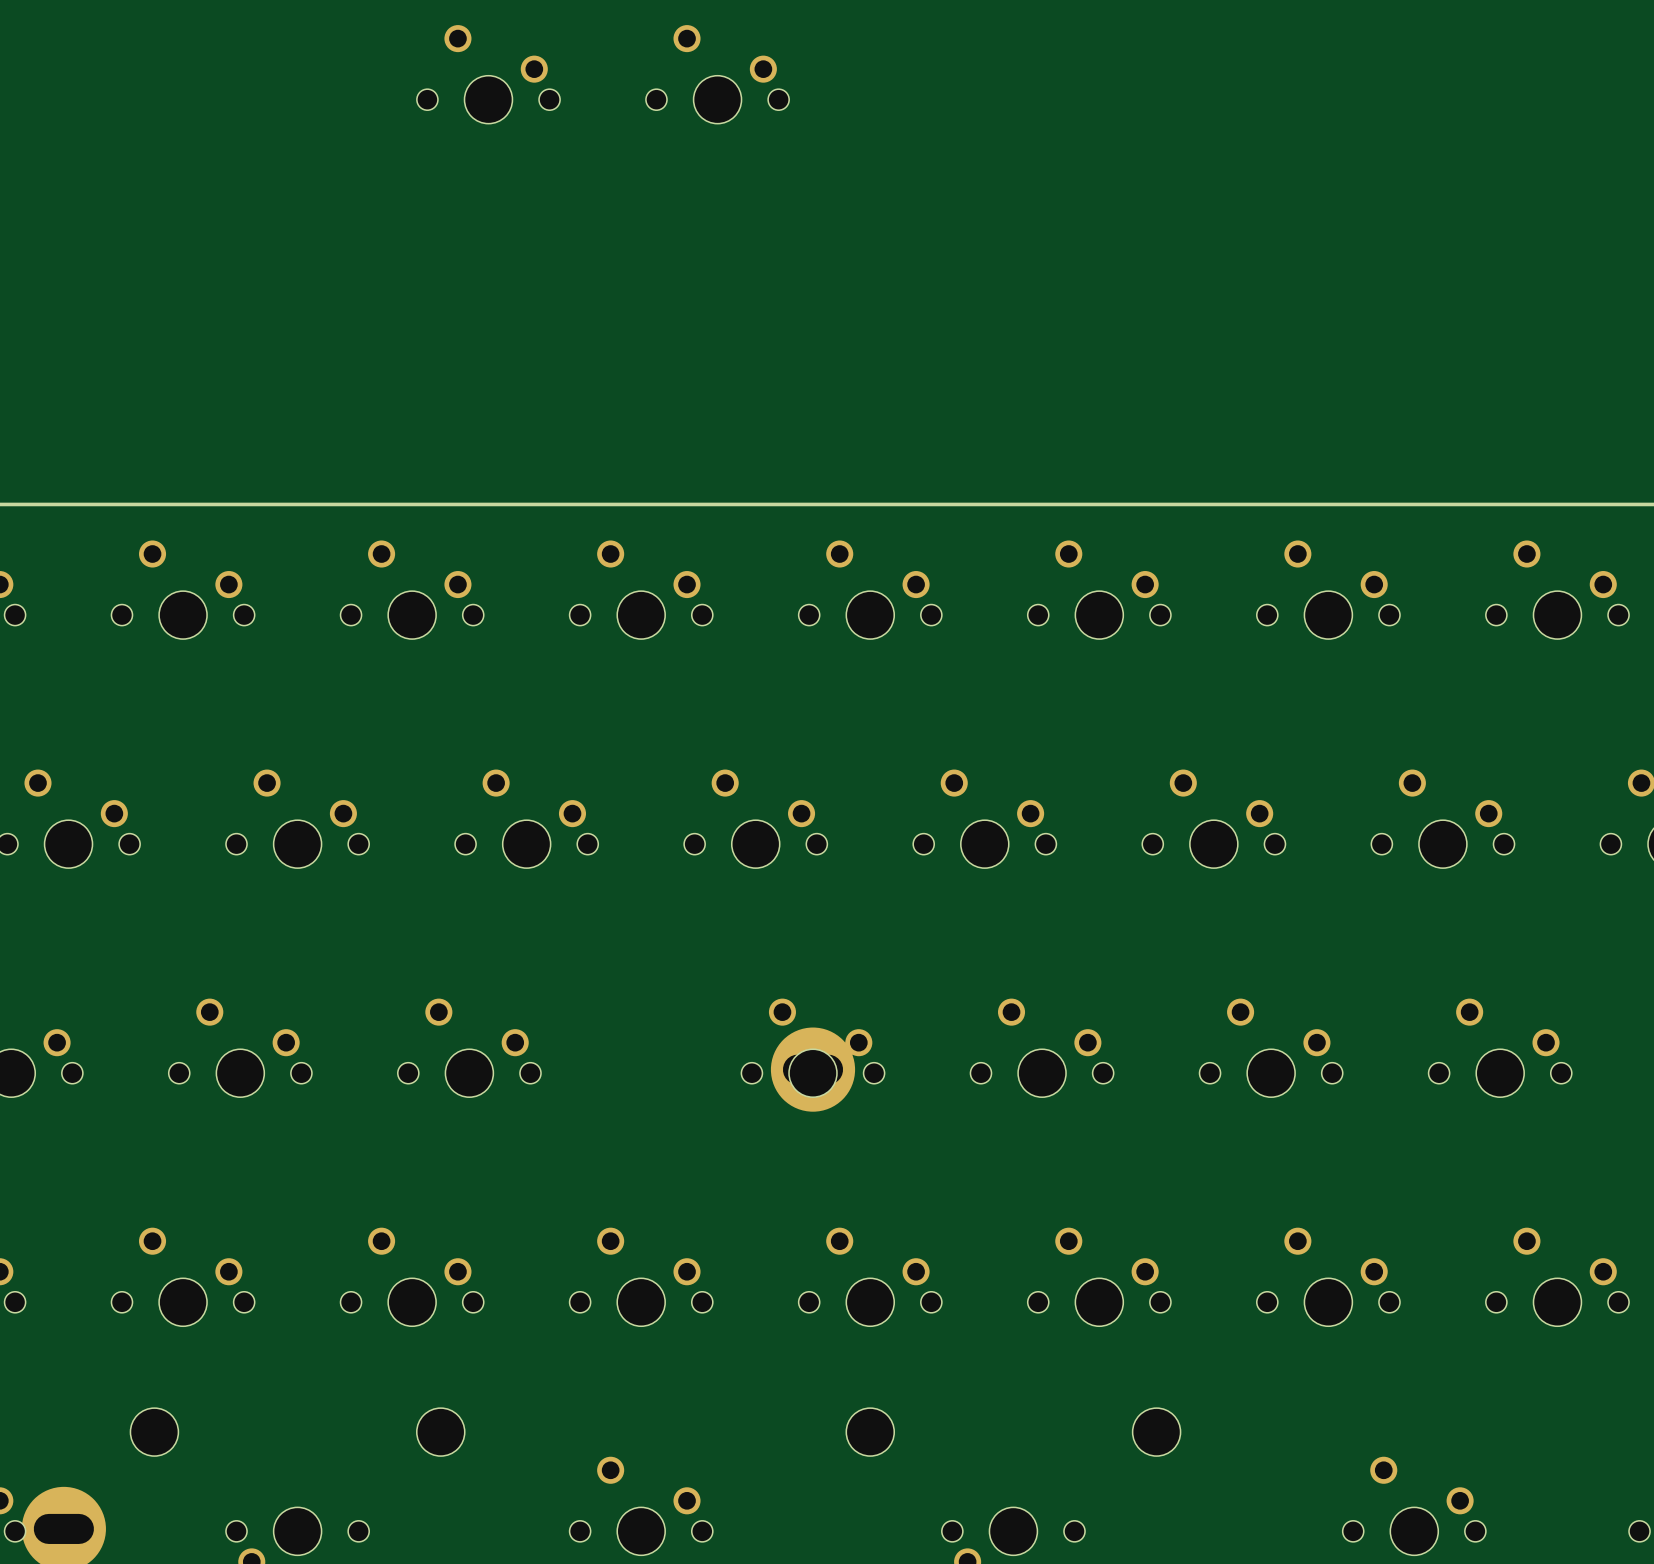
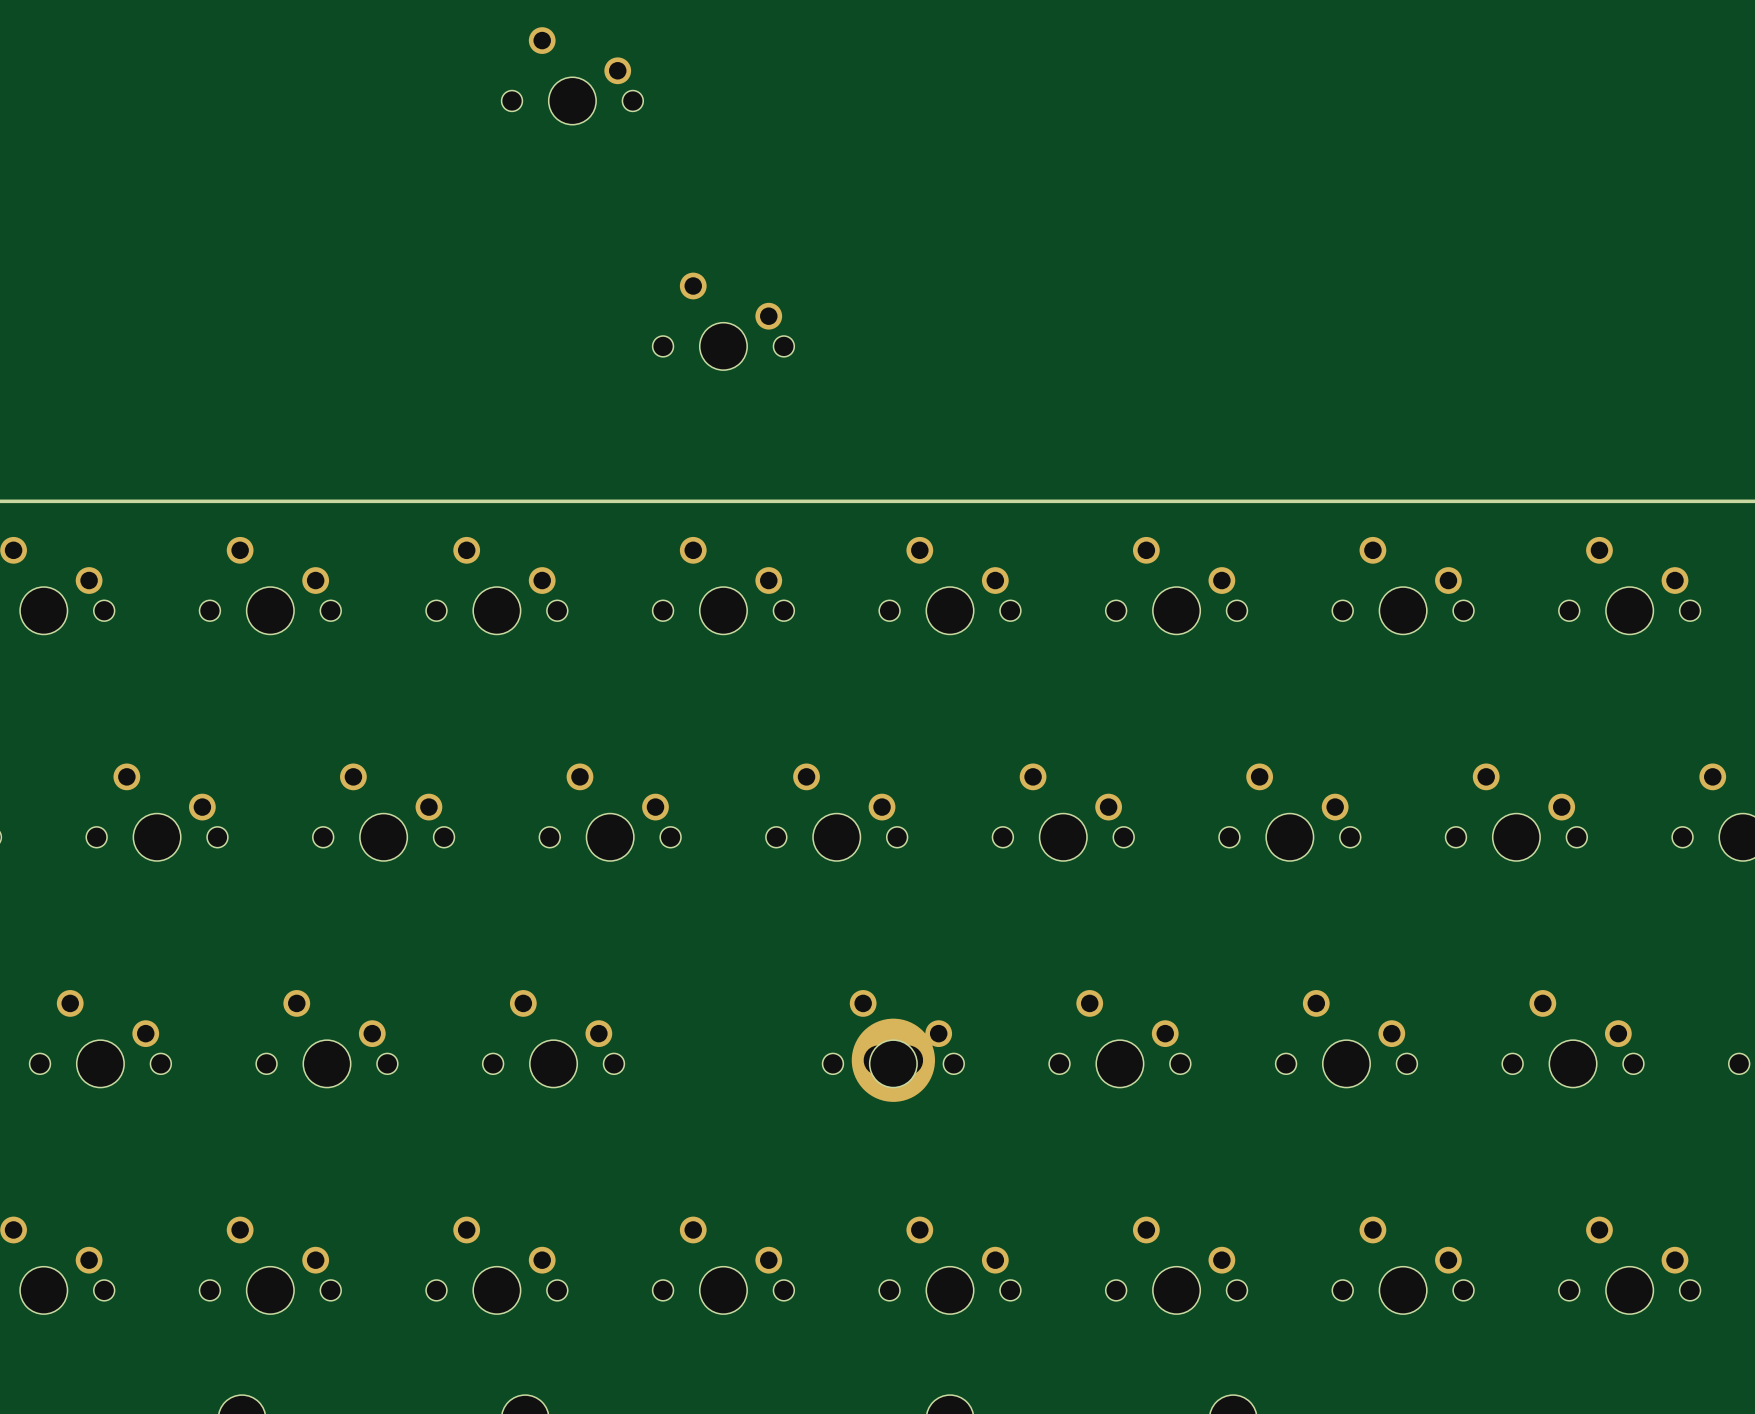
part position: (717, 74) -> (723, 321)

